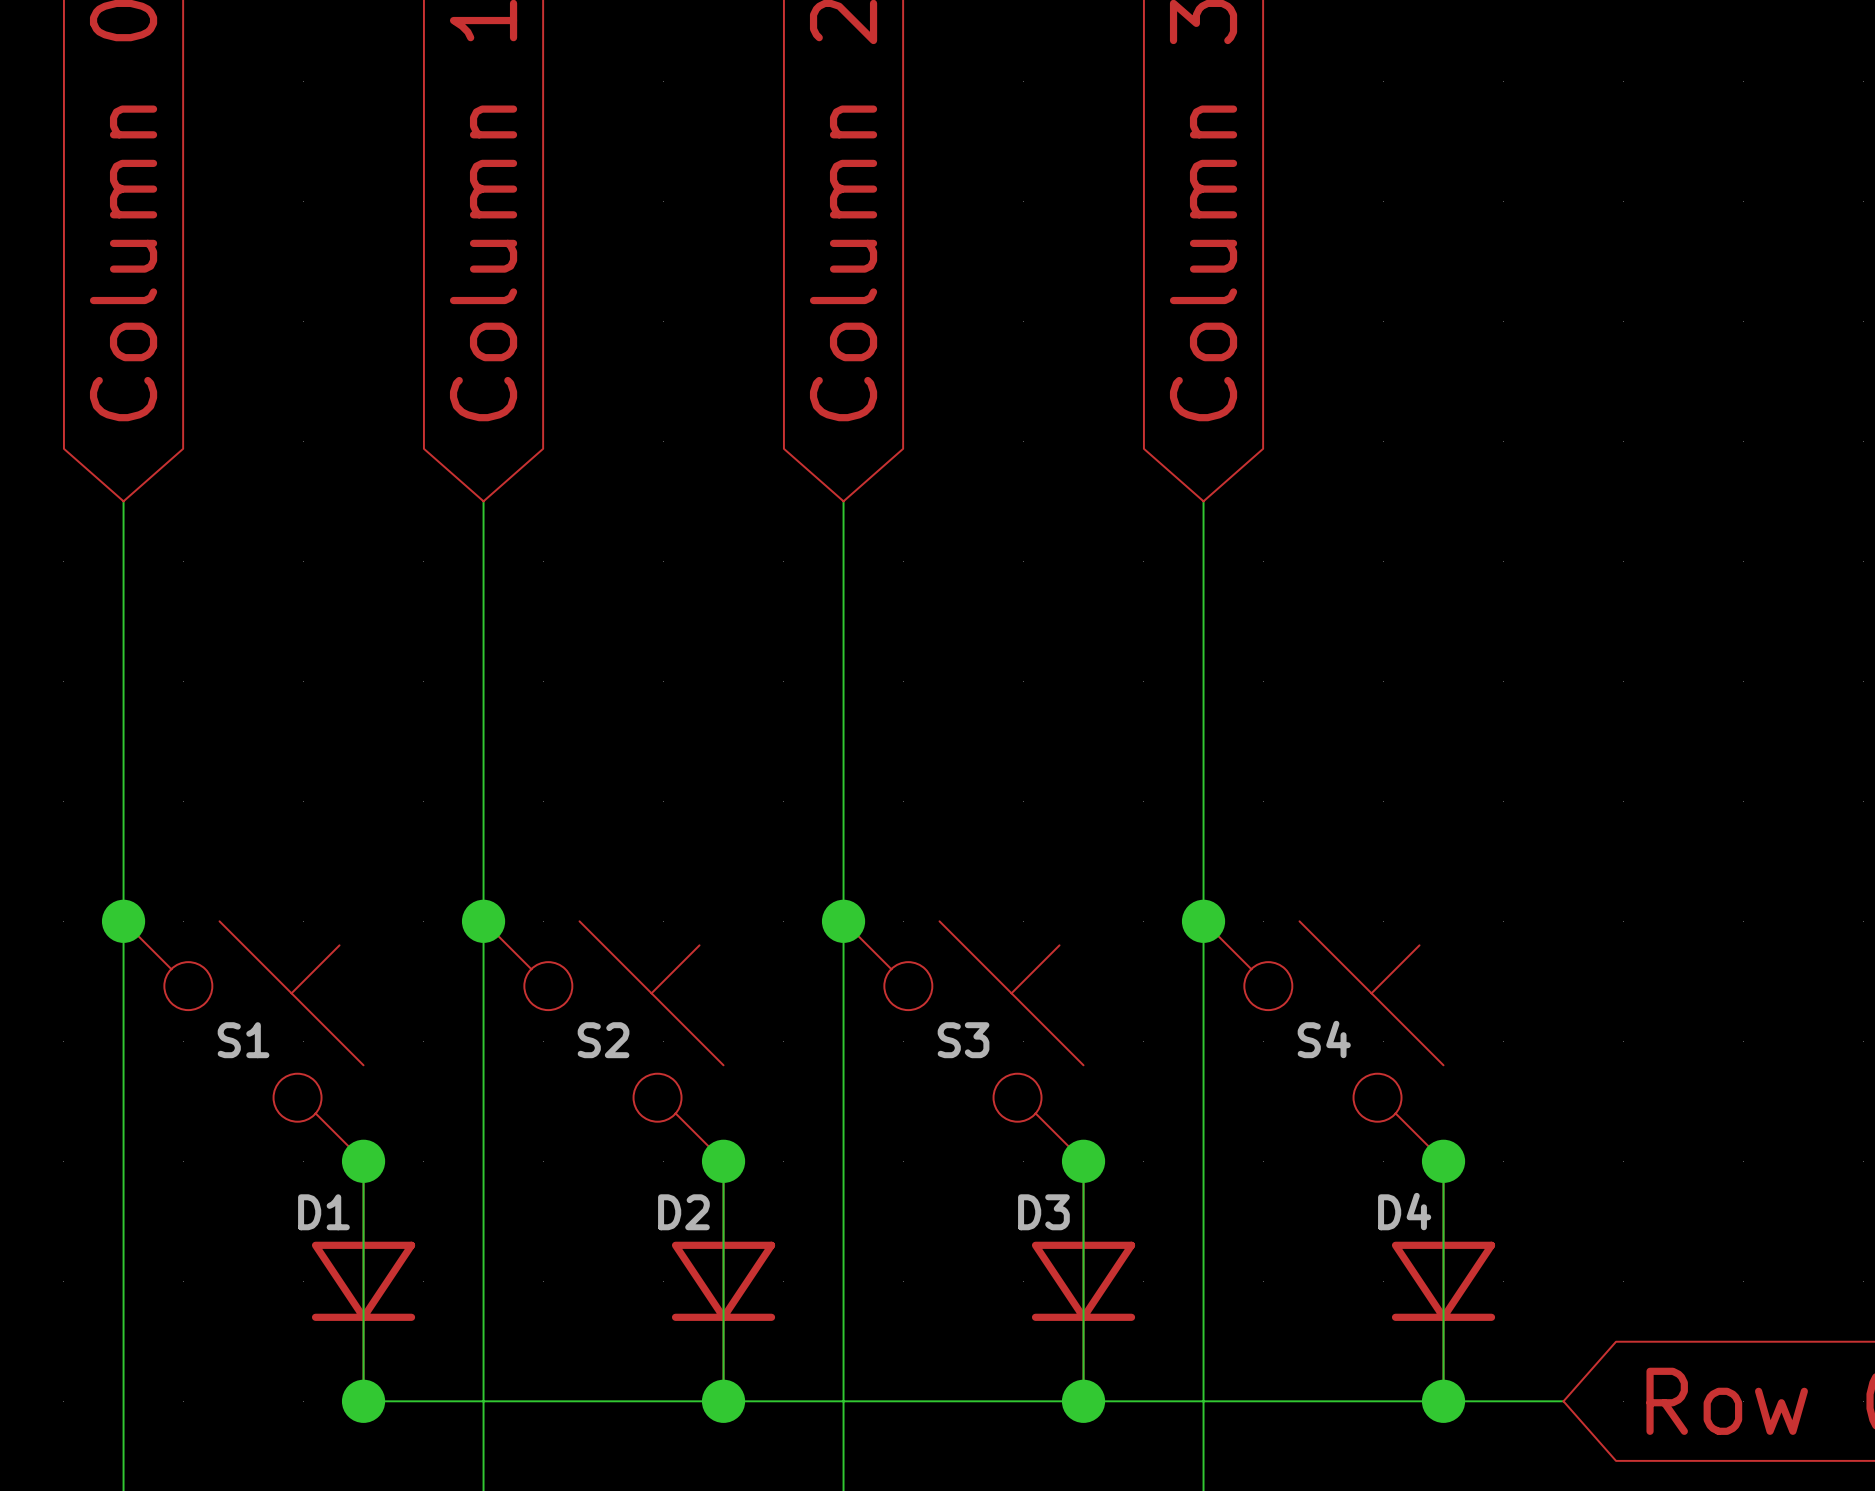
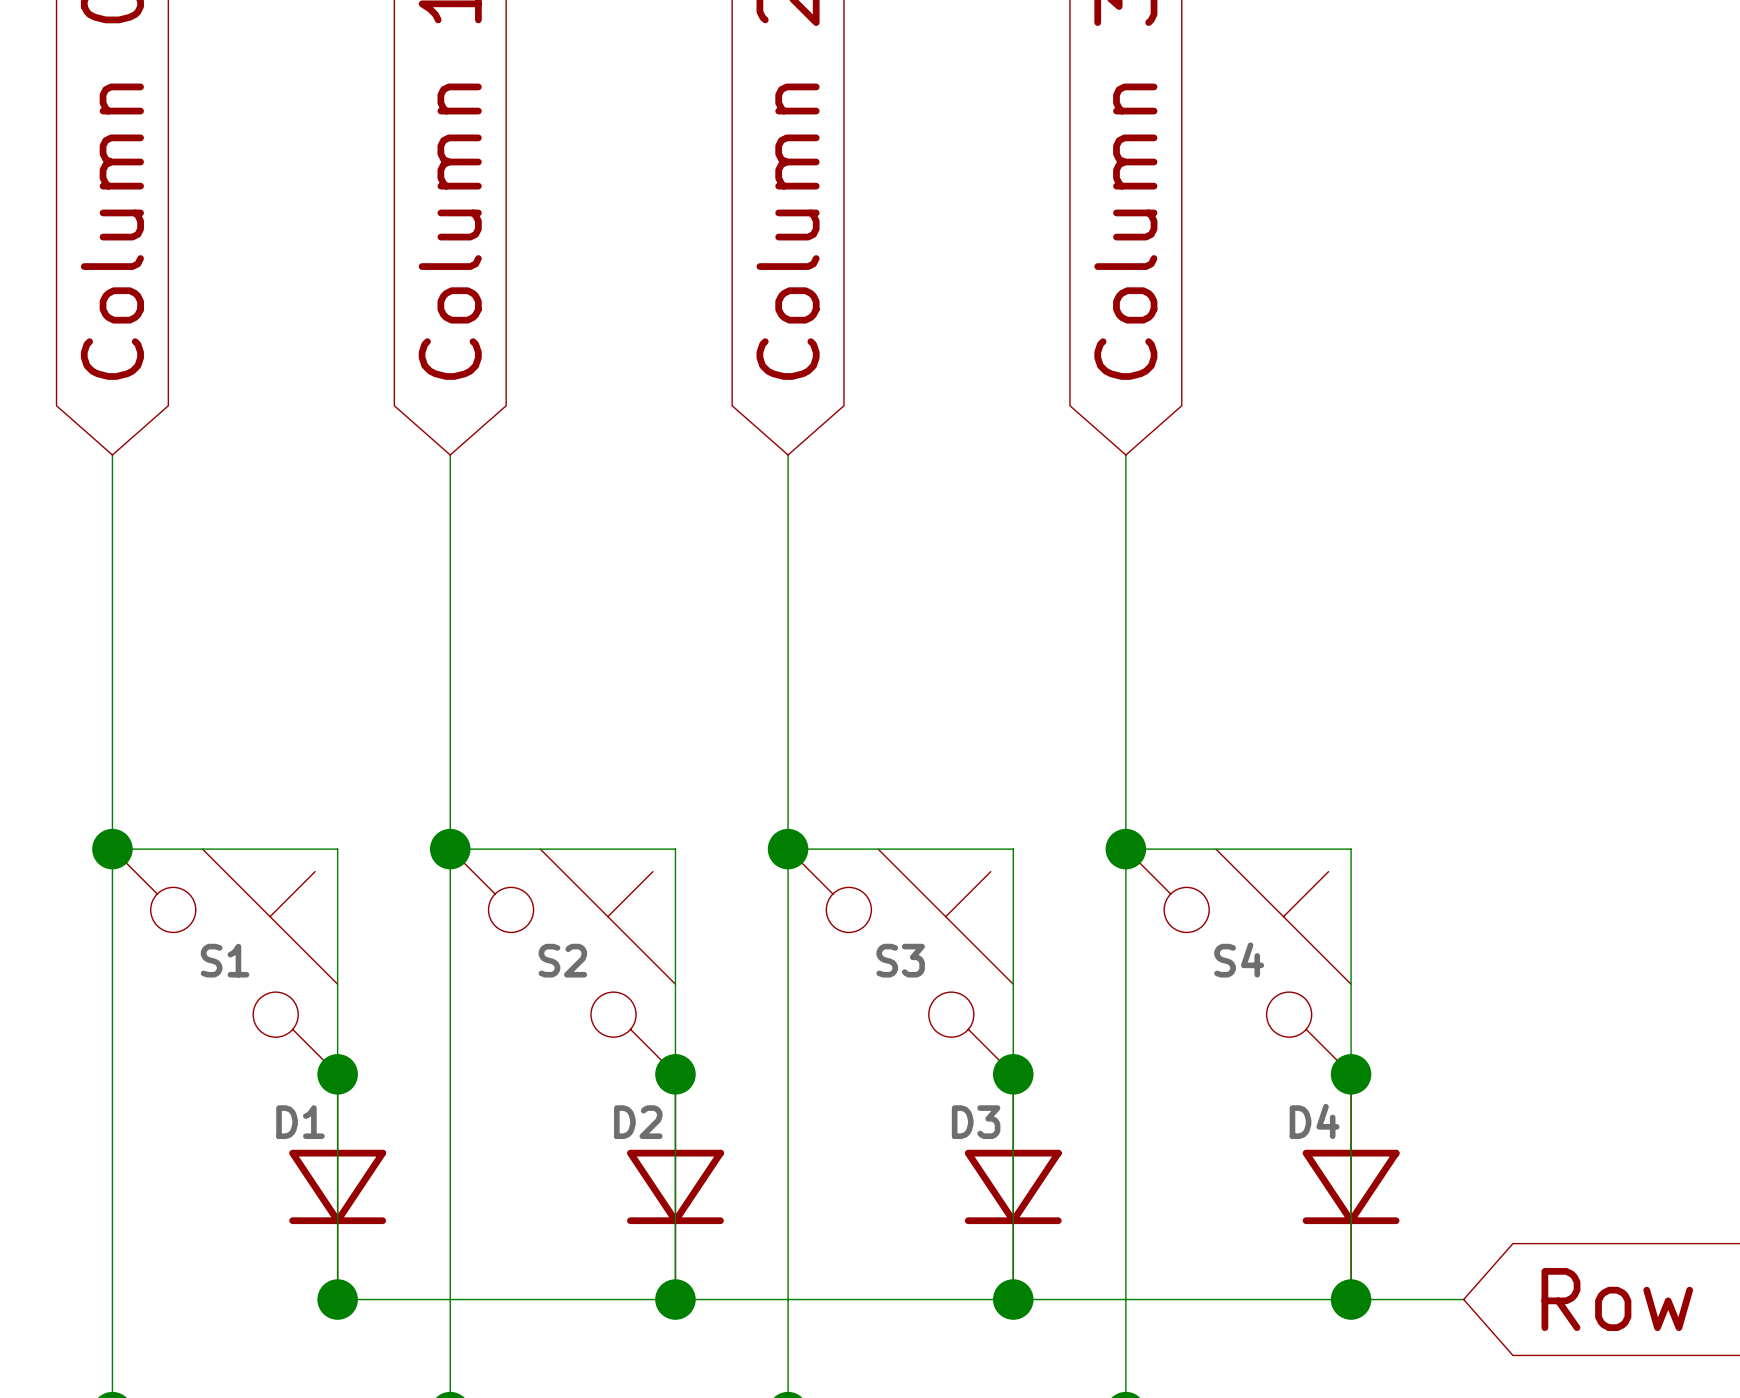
wire: none -> (112, 849) (337, 849) (337, 1074)
wire: none -> (450, 849) (675, 849) (675, 1074)
wire: none -> (788, 849) (1013, 849) (1013, 1074)
wire: none -> (1125, 849) (1351, 849) (1351, 1074)

